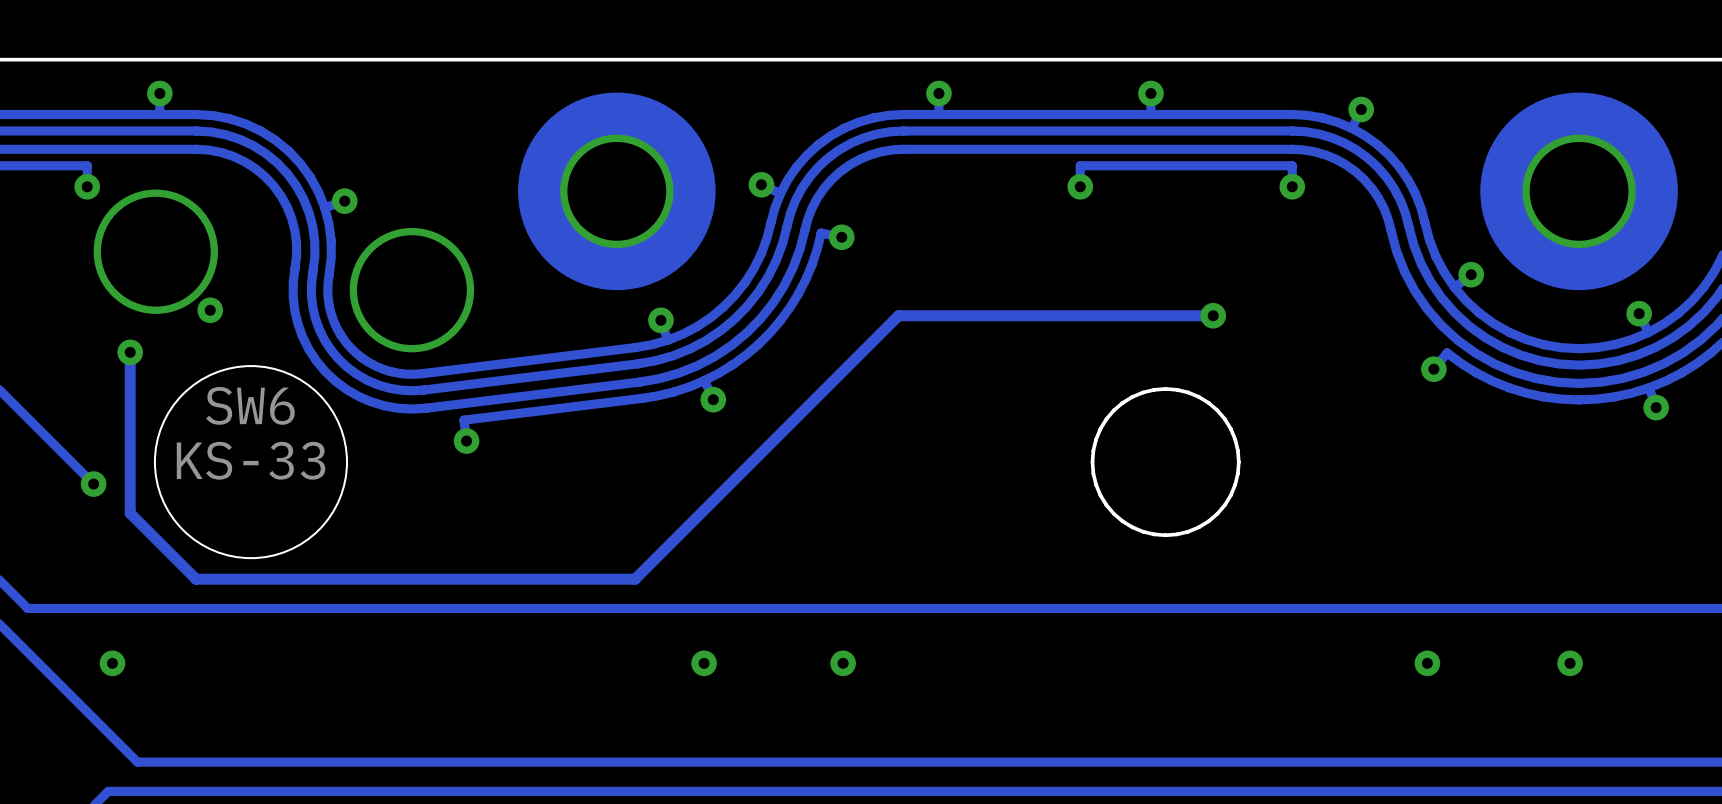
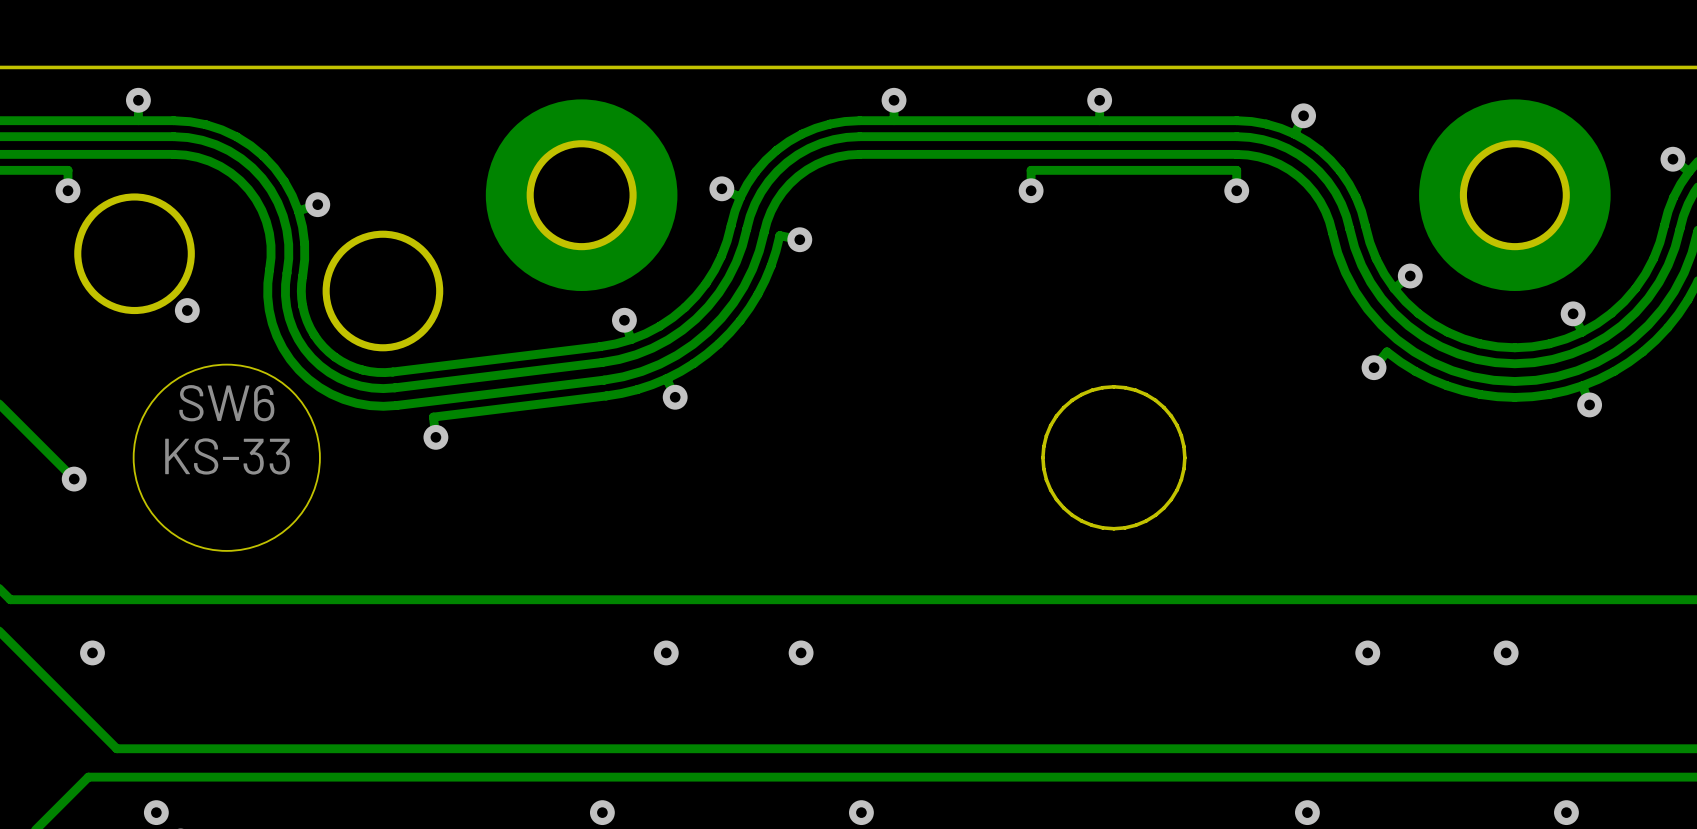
track: (1213, 315) (898, 315) (635, 579) (196, 579) (130, 513) (130, 352) -> none
via: (1213, 315) -> none
via: (130, 352) -> none

